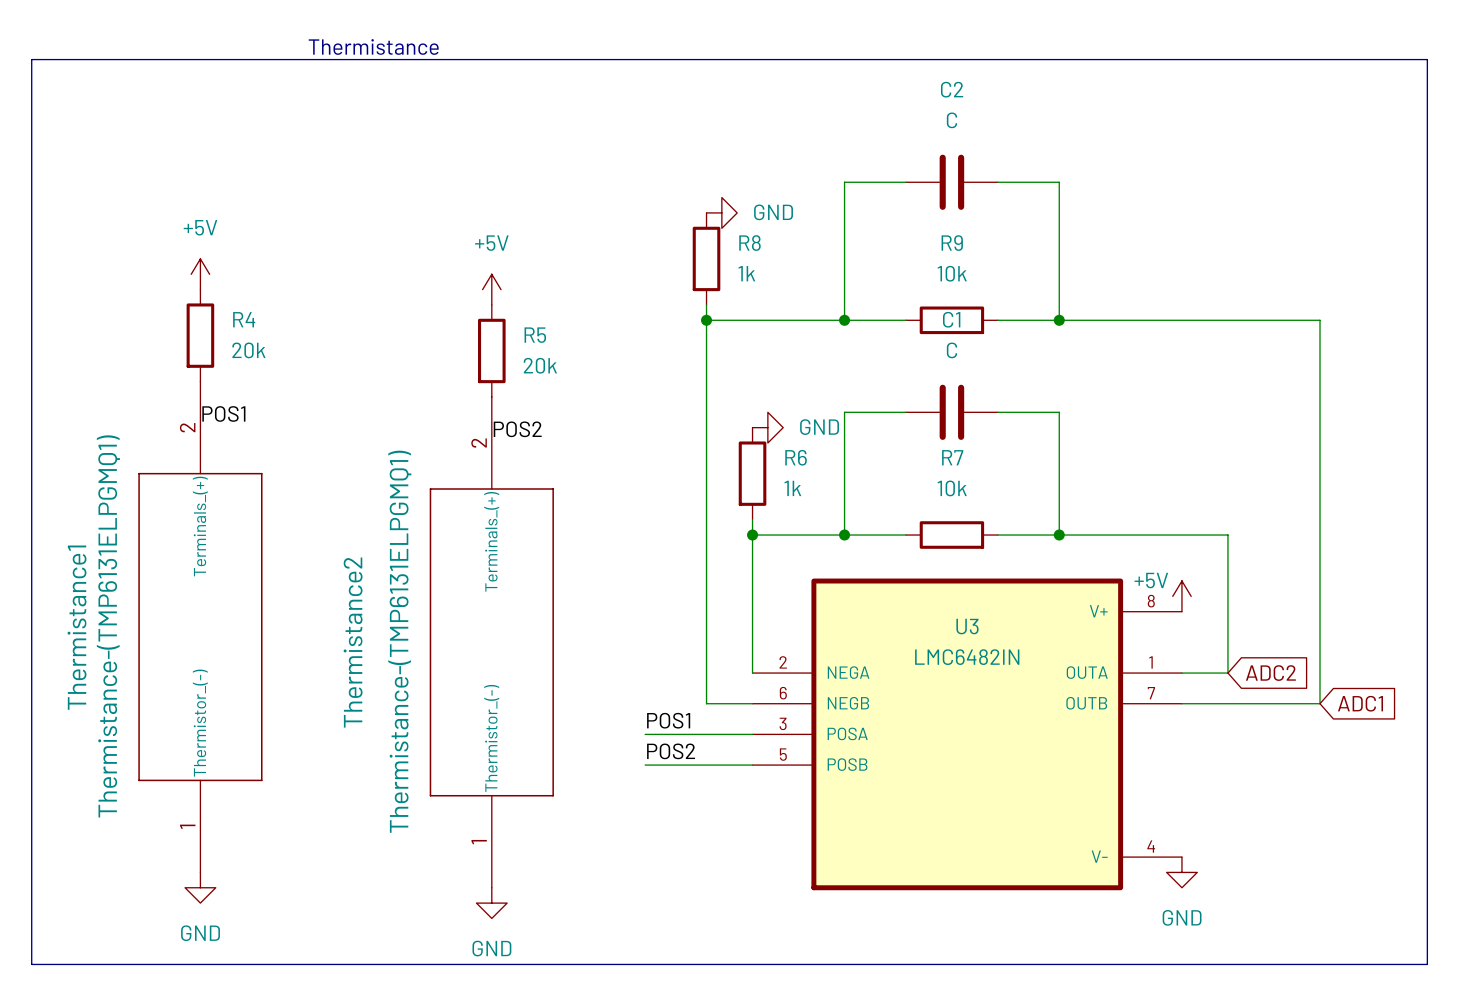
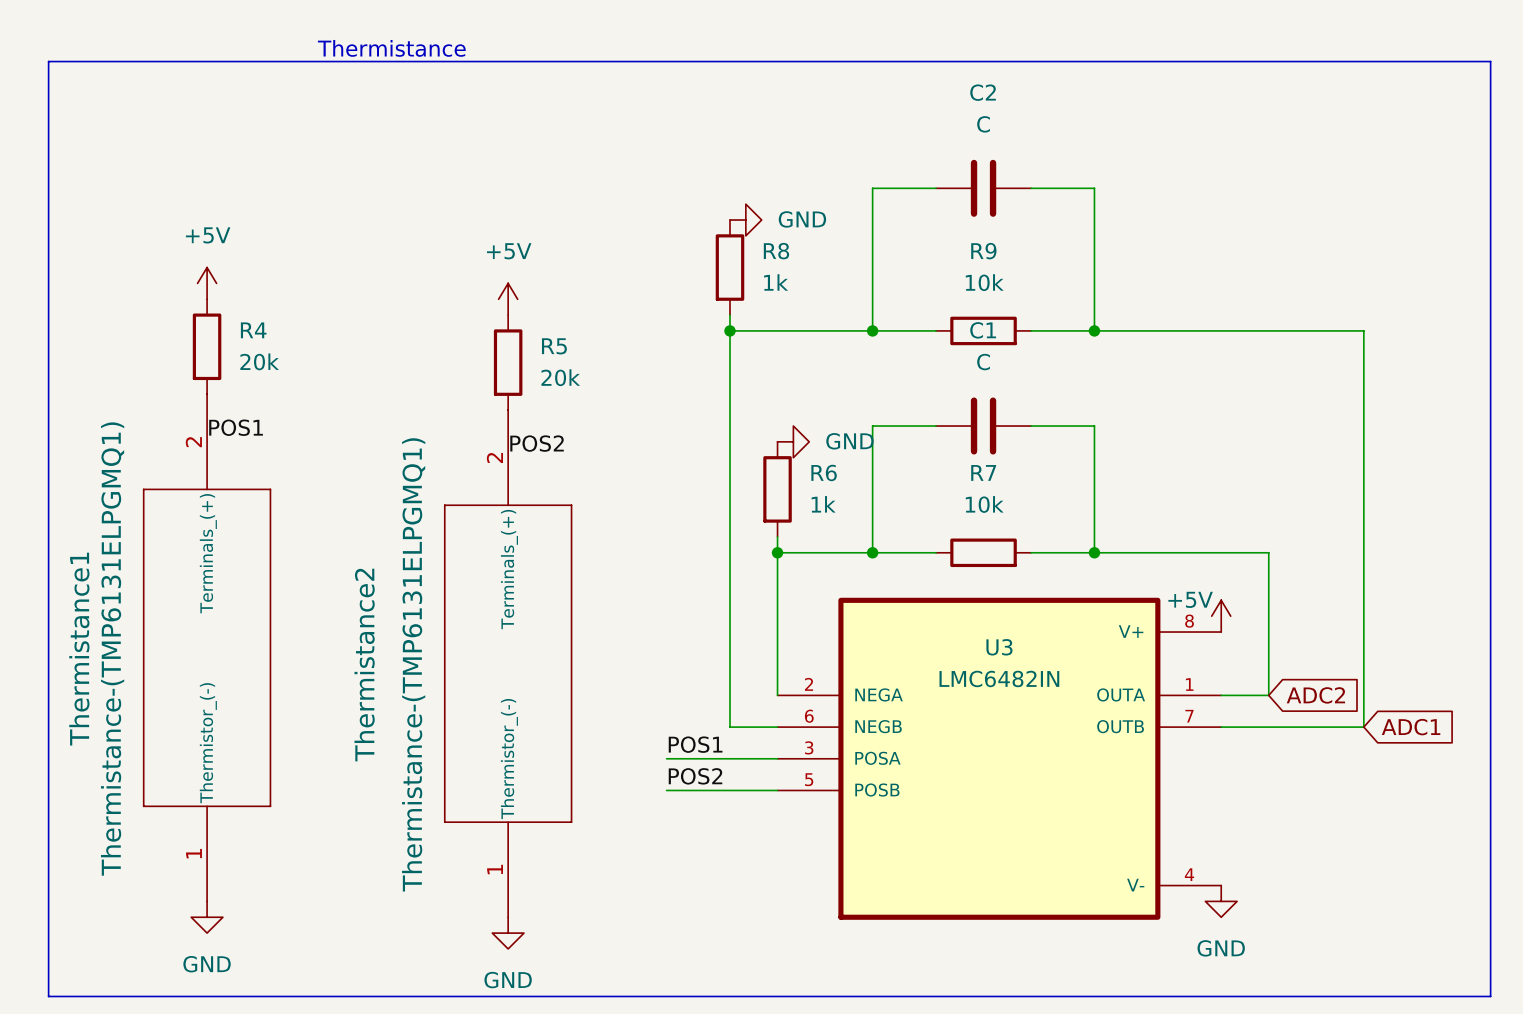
line: (47, 59) (31, 59) (31, 964) (47, 964) -> (48, 61) (48, 996)
line: (1427, 59) (1427, 964) -> (1474, 61) (1490, 61) (1490, 996) (1474, 996)

